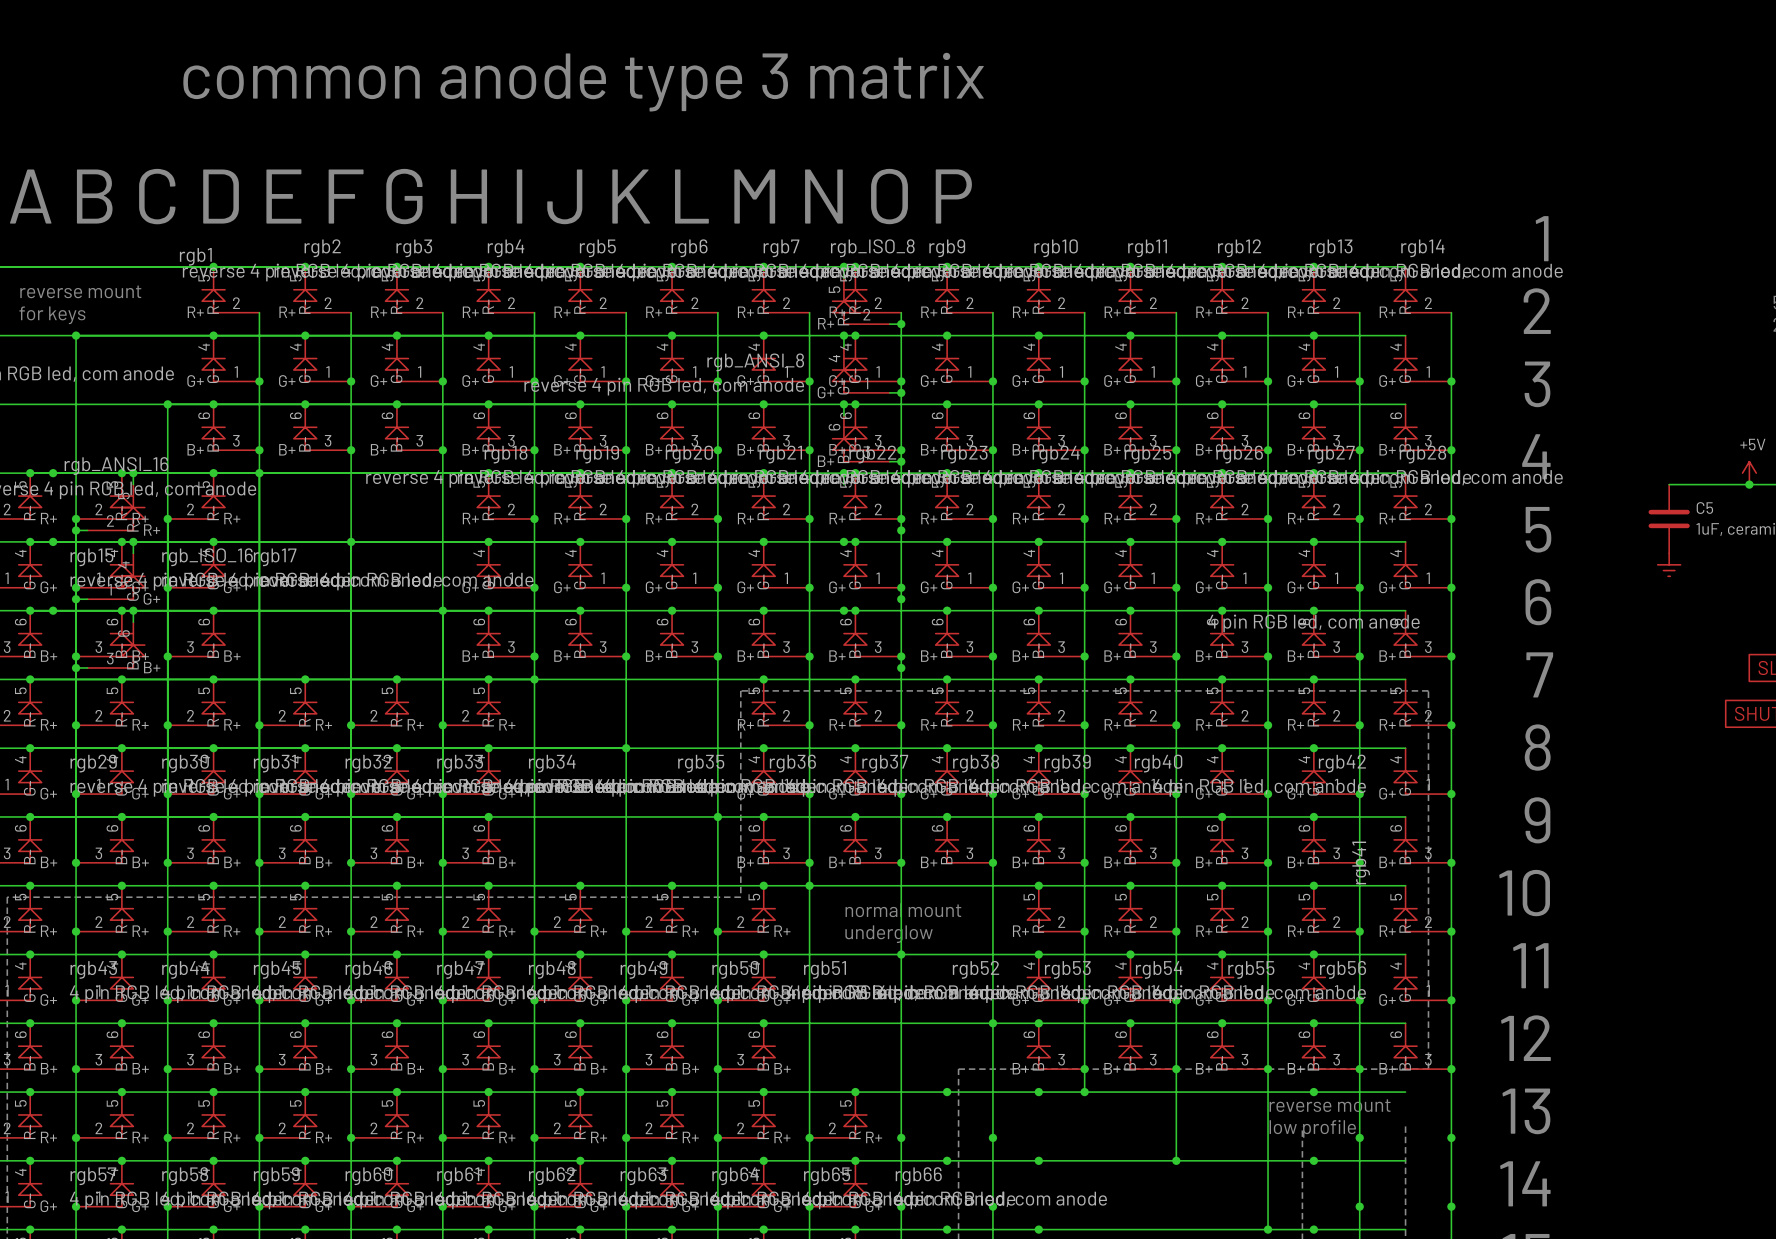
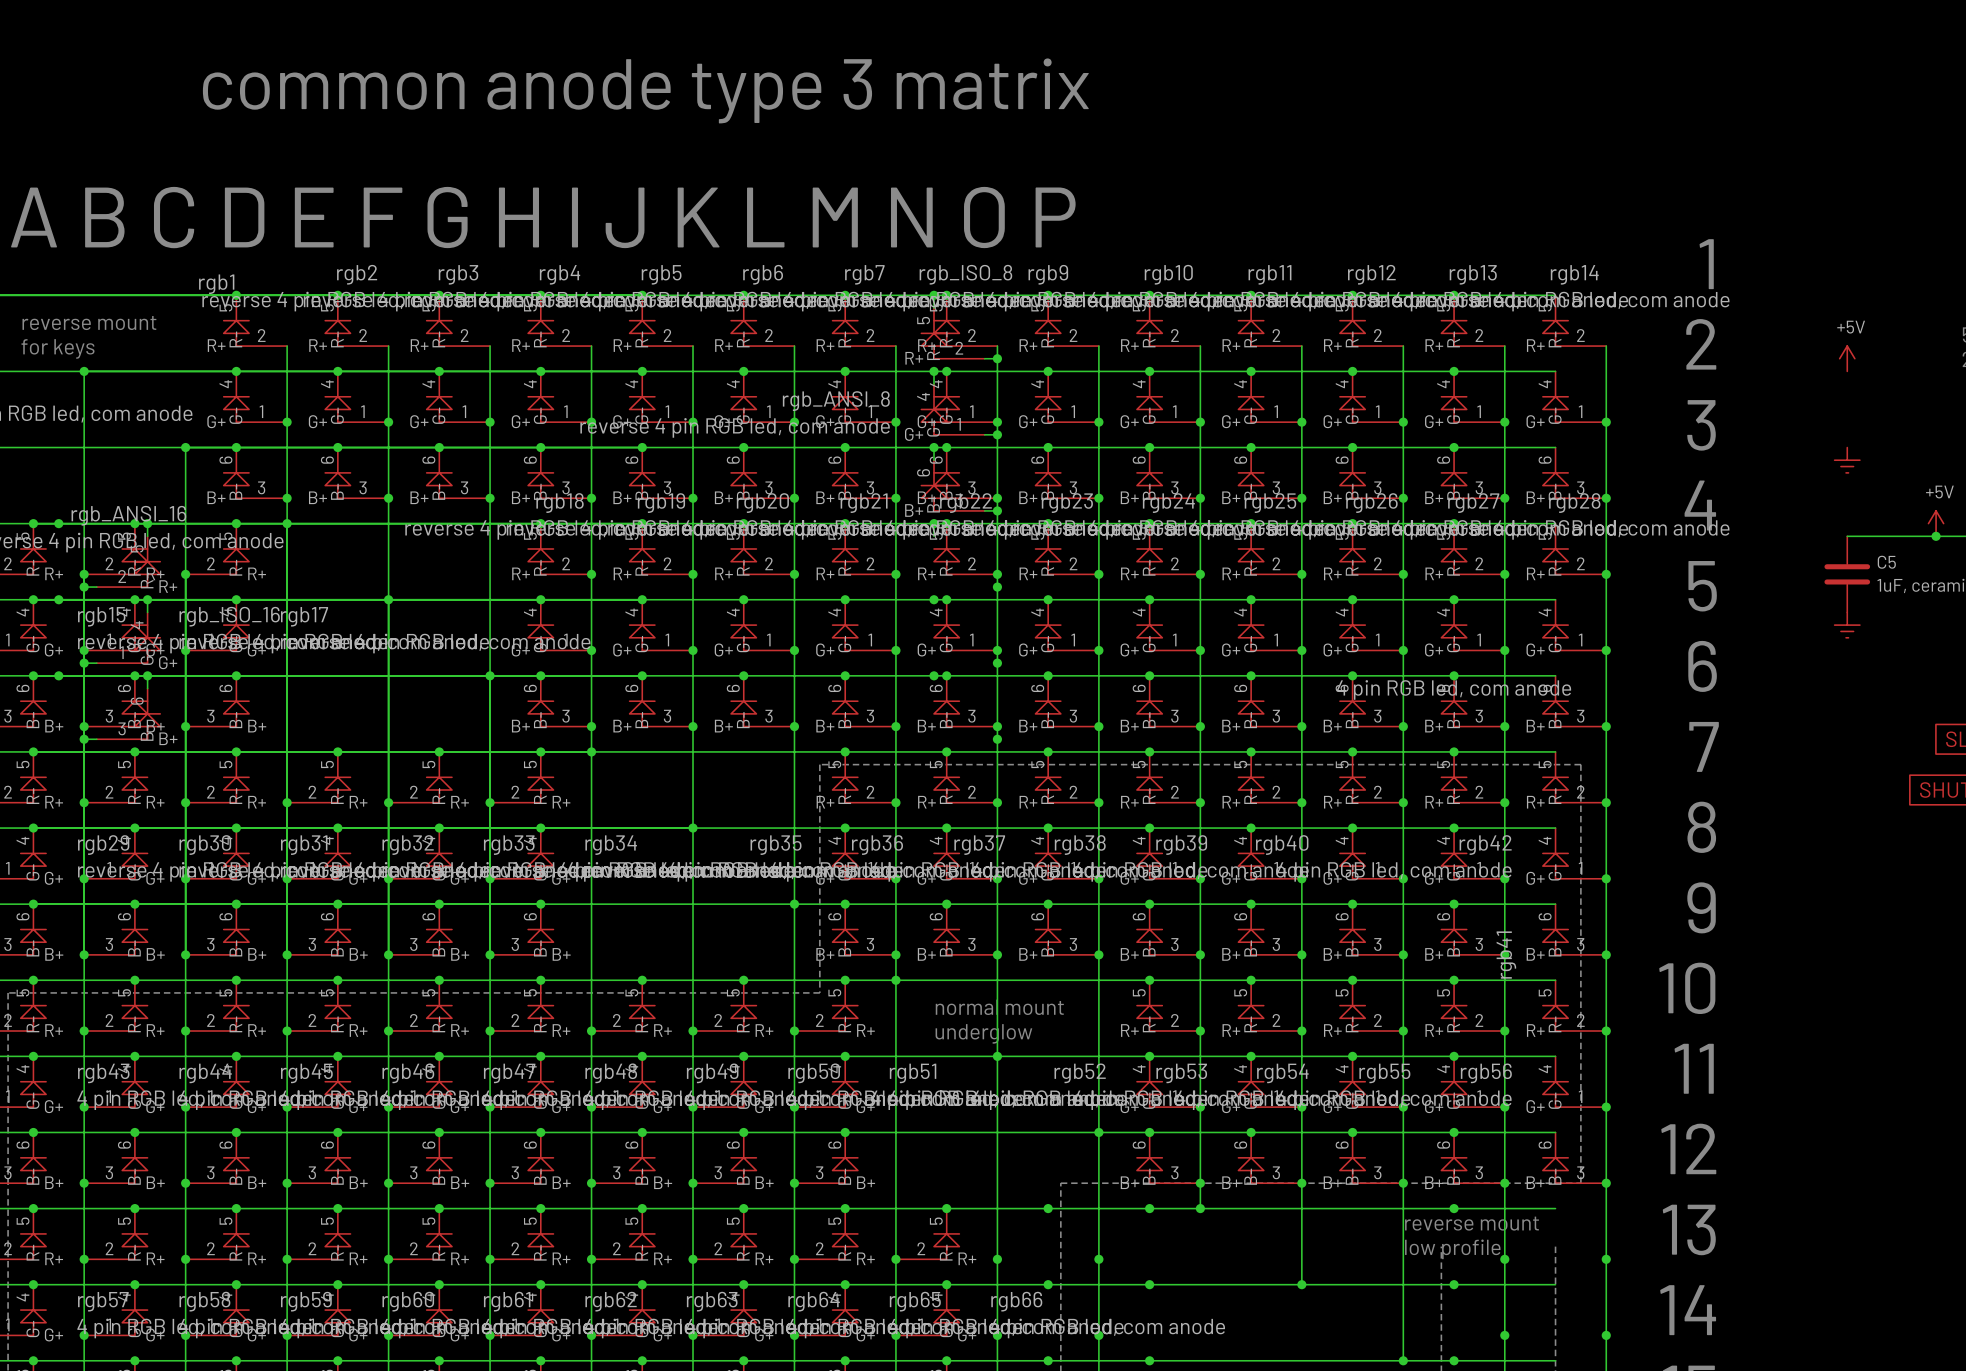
power symbol: none -> +5V (1847, 358)
power symbol: none -> (1847, 460)

